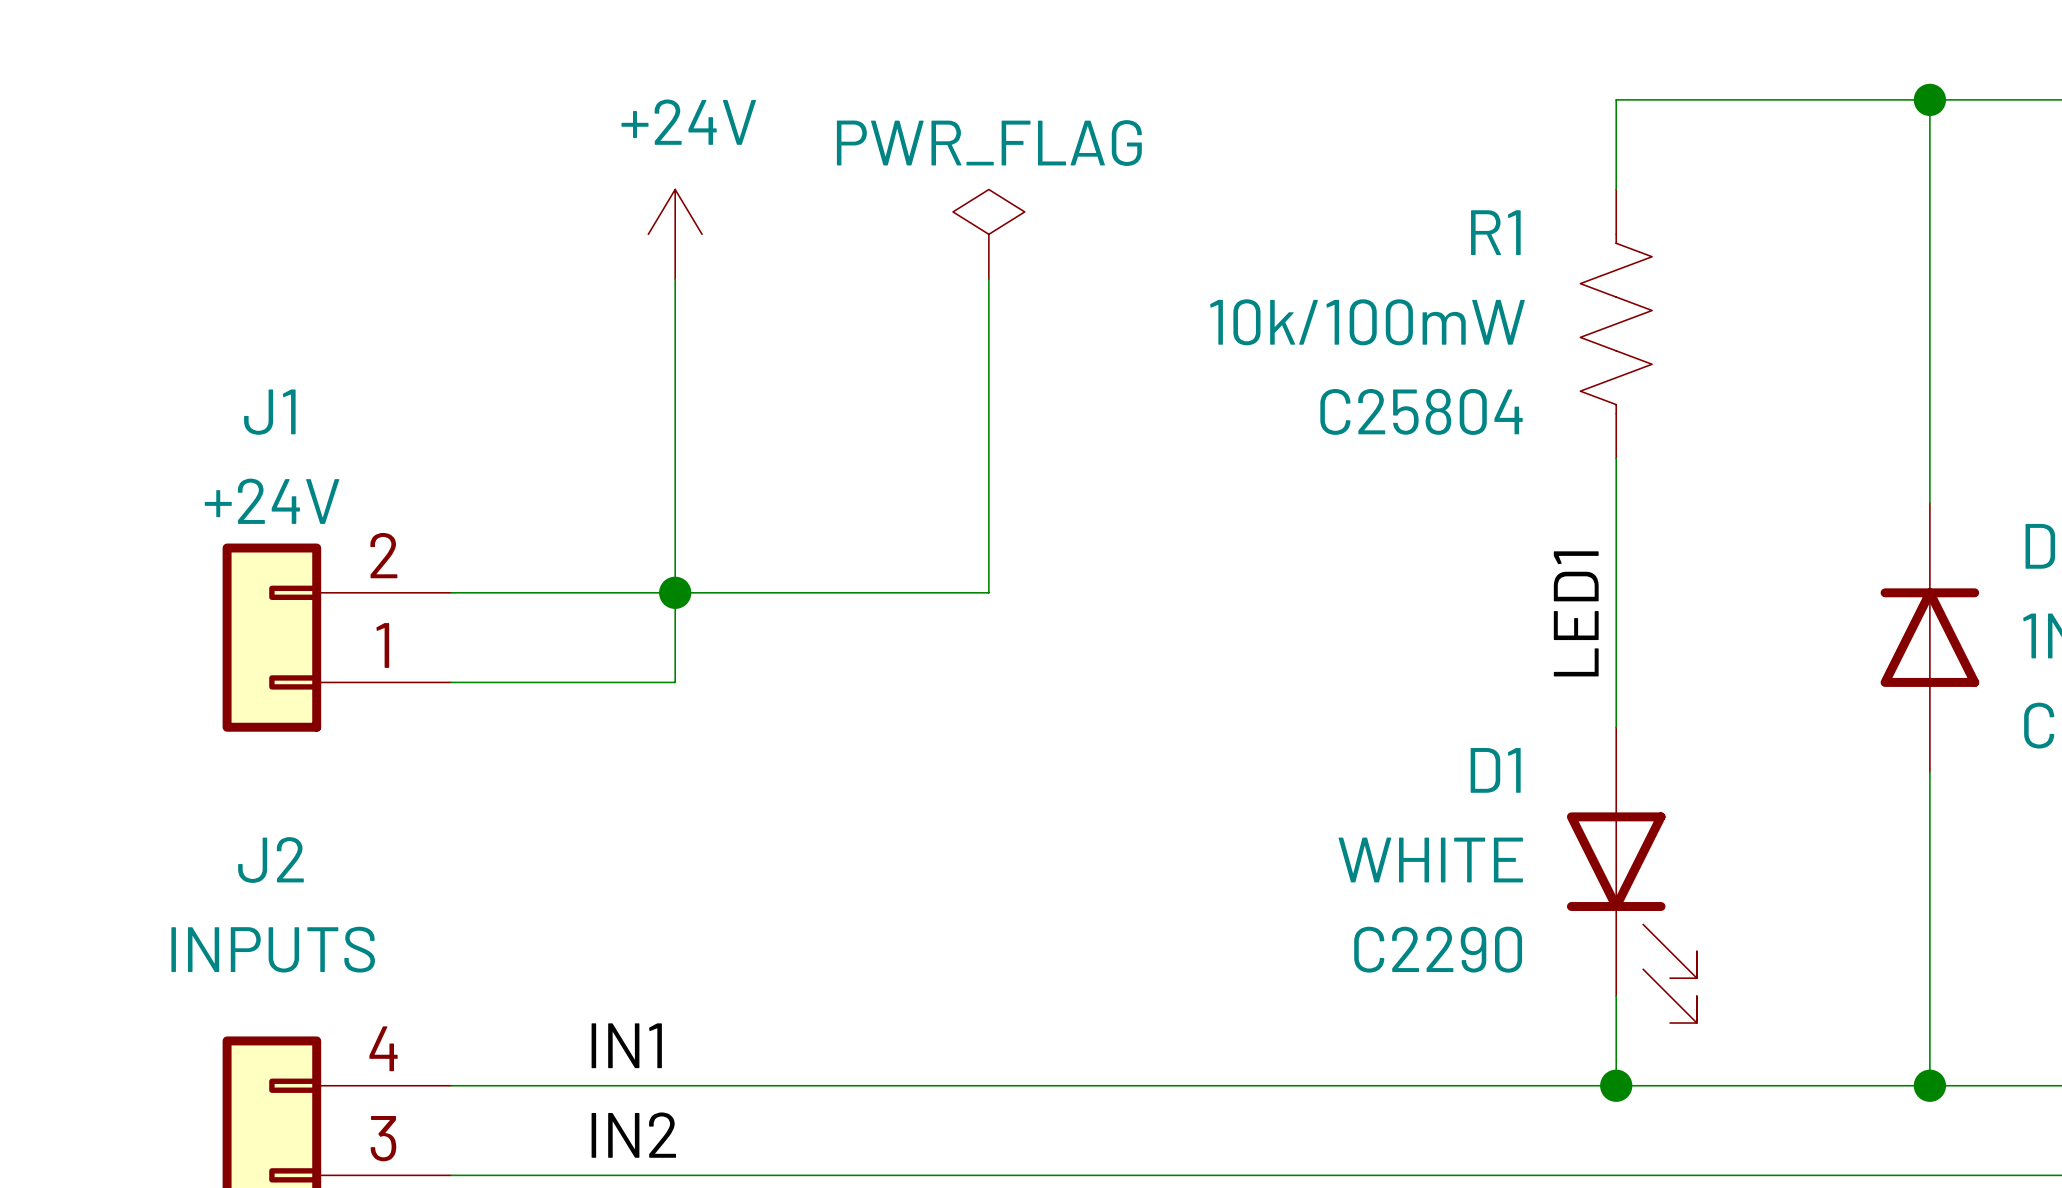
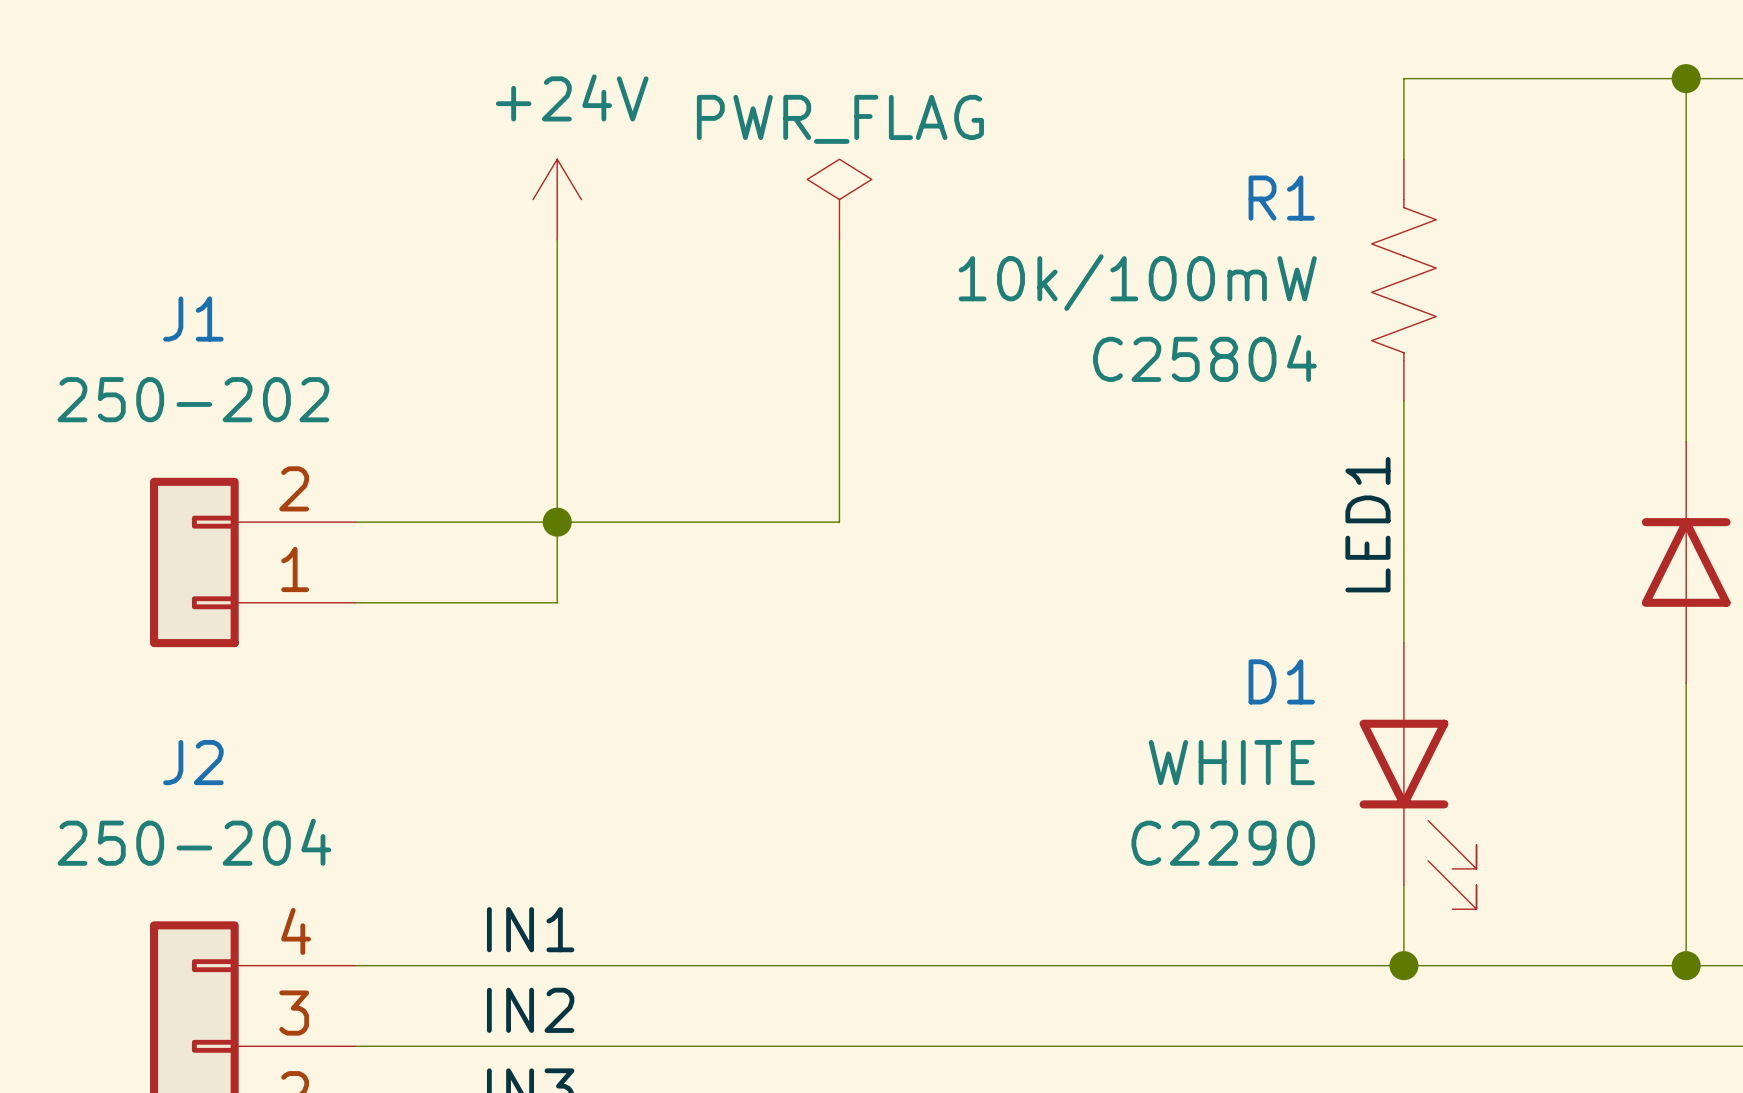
J1 name position: J1 (269, 412) -> J1 (193, 319)
J1 value: +24V (272, 501) -> 250-202 (193, 399)
J2 value: INPUTS (273, 949) -> 250-204 (194, 842)

